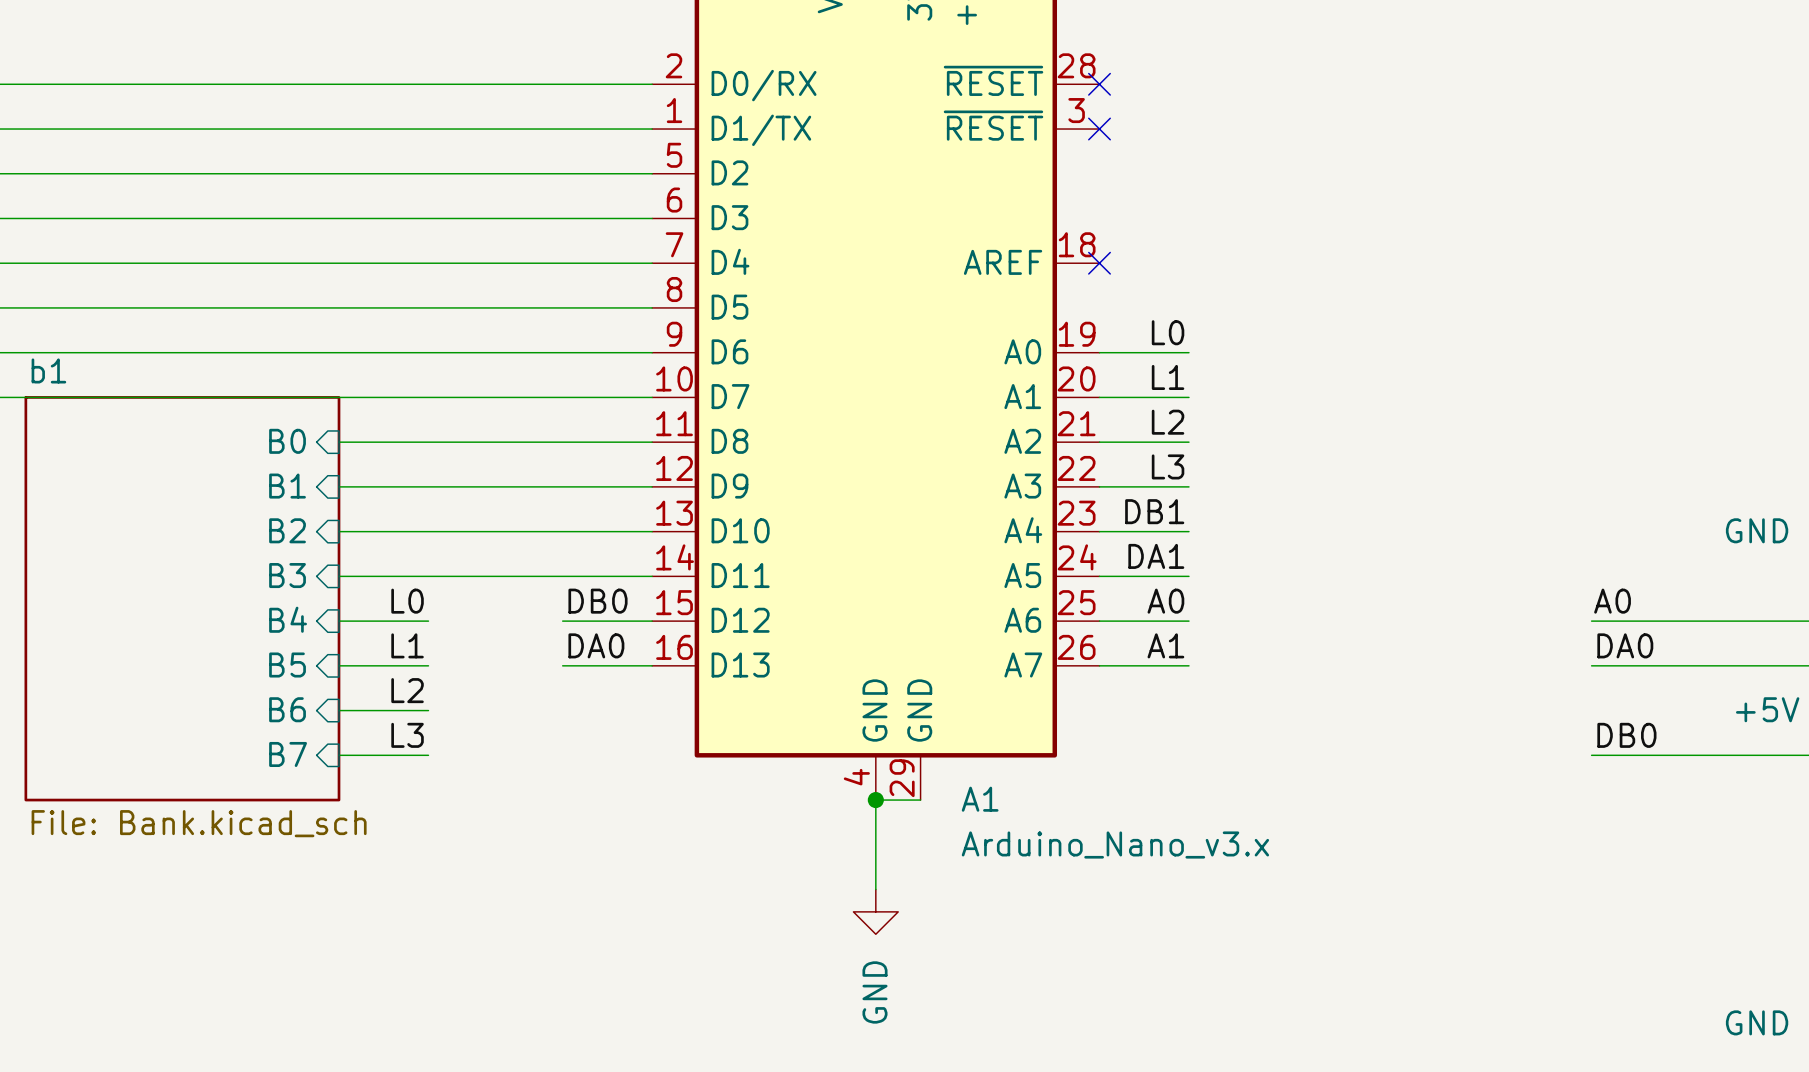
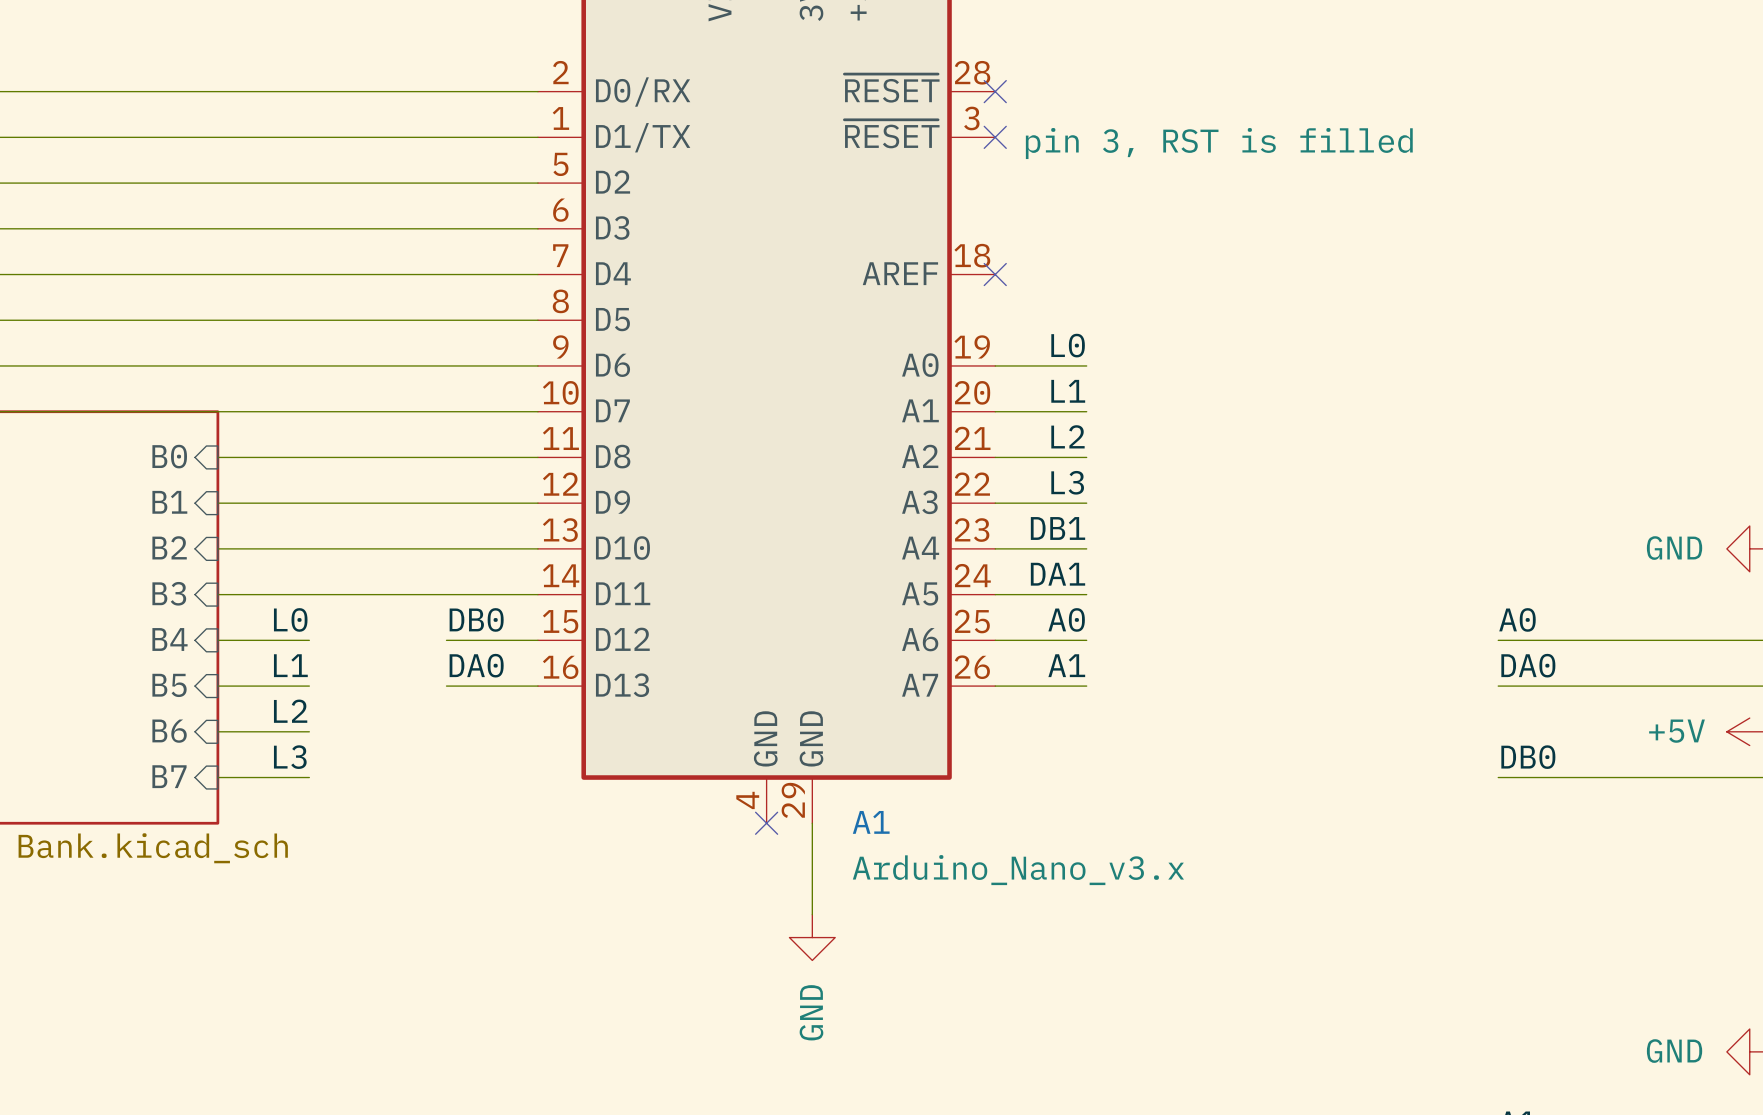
A1 text: none -> pin 3, RST is filled (1219, 143)
junction: (875, 800) -> none
no-connect mark: none -> (766, 823)
wire: (920, 800) (875, 800) (875, 889) -> (812, 823) (812, 914)
power symbol position: GND (875, 911) -> GND (812, 937)

